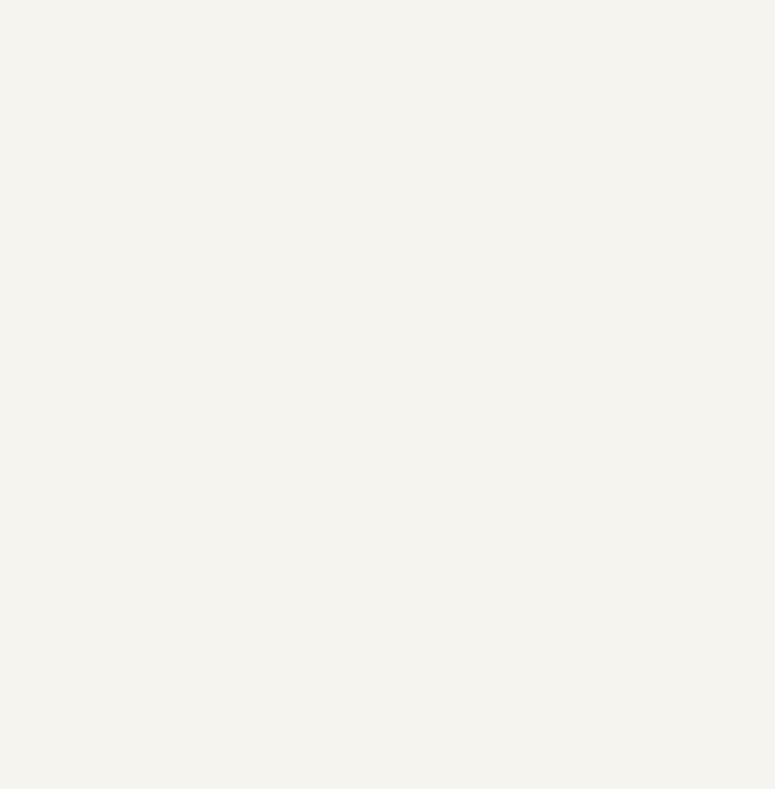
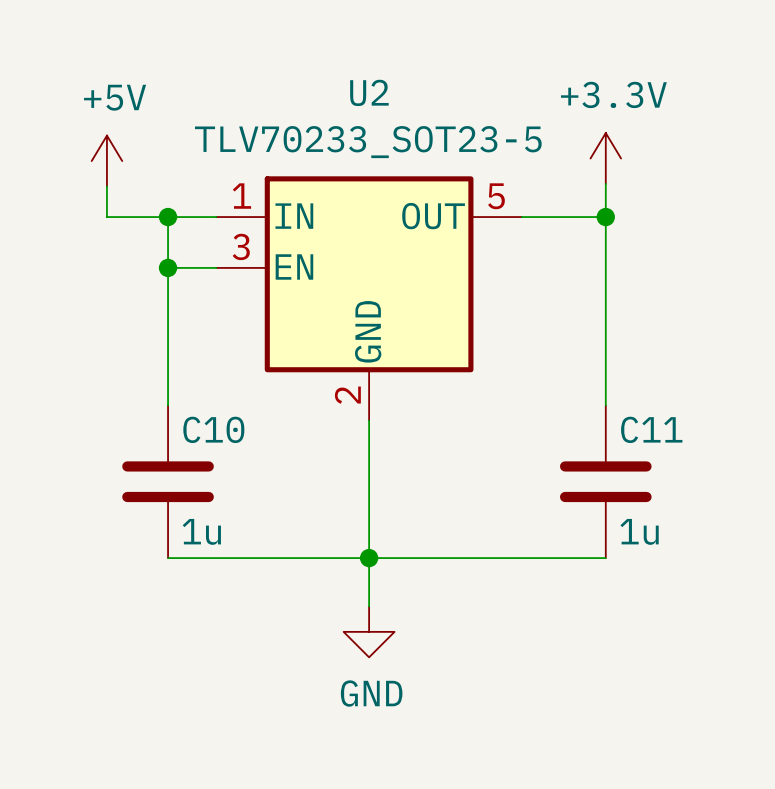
power symbol: none -> +3.3V (605, 158)
power symbol: none -> +5V (106, 161)
wire: none -> (605, 183) (605, 405)
wire: none -> (106, 186) (106, 217) (216, 217)
wire: none -> (168, 217) (168, 405)
junction: none -> (168, 217)
wire: none -> (521, 217) (605, 217)
junction: none -> (605, 217)
wire: none -> (168, 267) (216, 267)
junction: none -> (168, 267)
U2: none -> TLV70233_SOT23-5 (369, 298)
wire: none -> (369, 420) (369, 606)
C10: none -> 1u (168, 481)
C11: none -> 1u (605, 481)
wire: none -> (168, 558) (605, 558)
junction: none -> (369, 558)
power symbol: none -> GND (369, 631)

